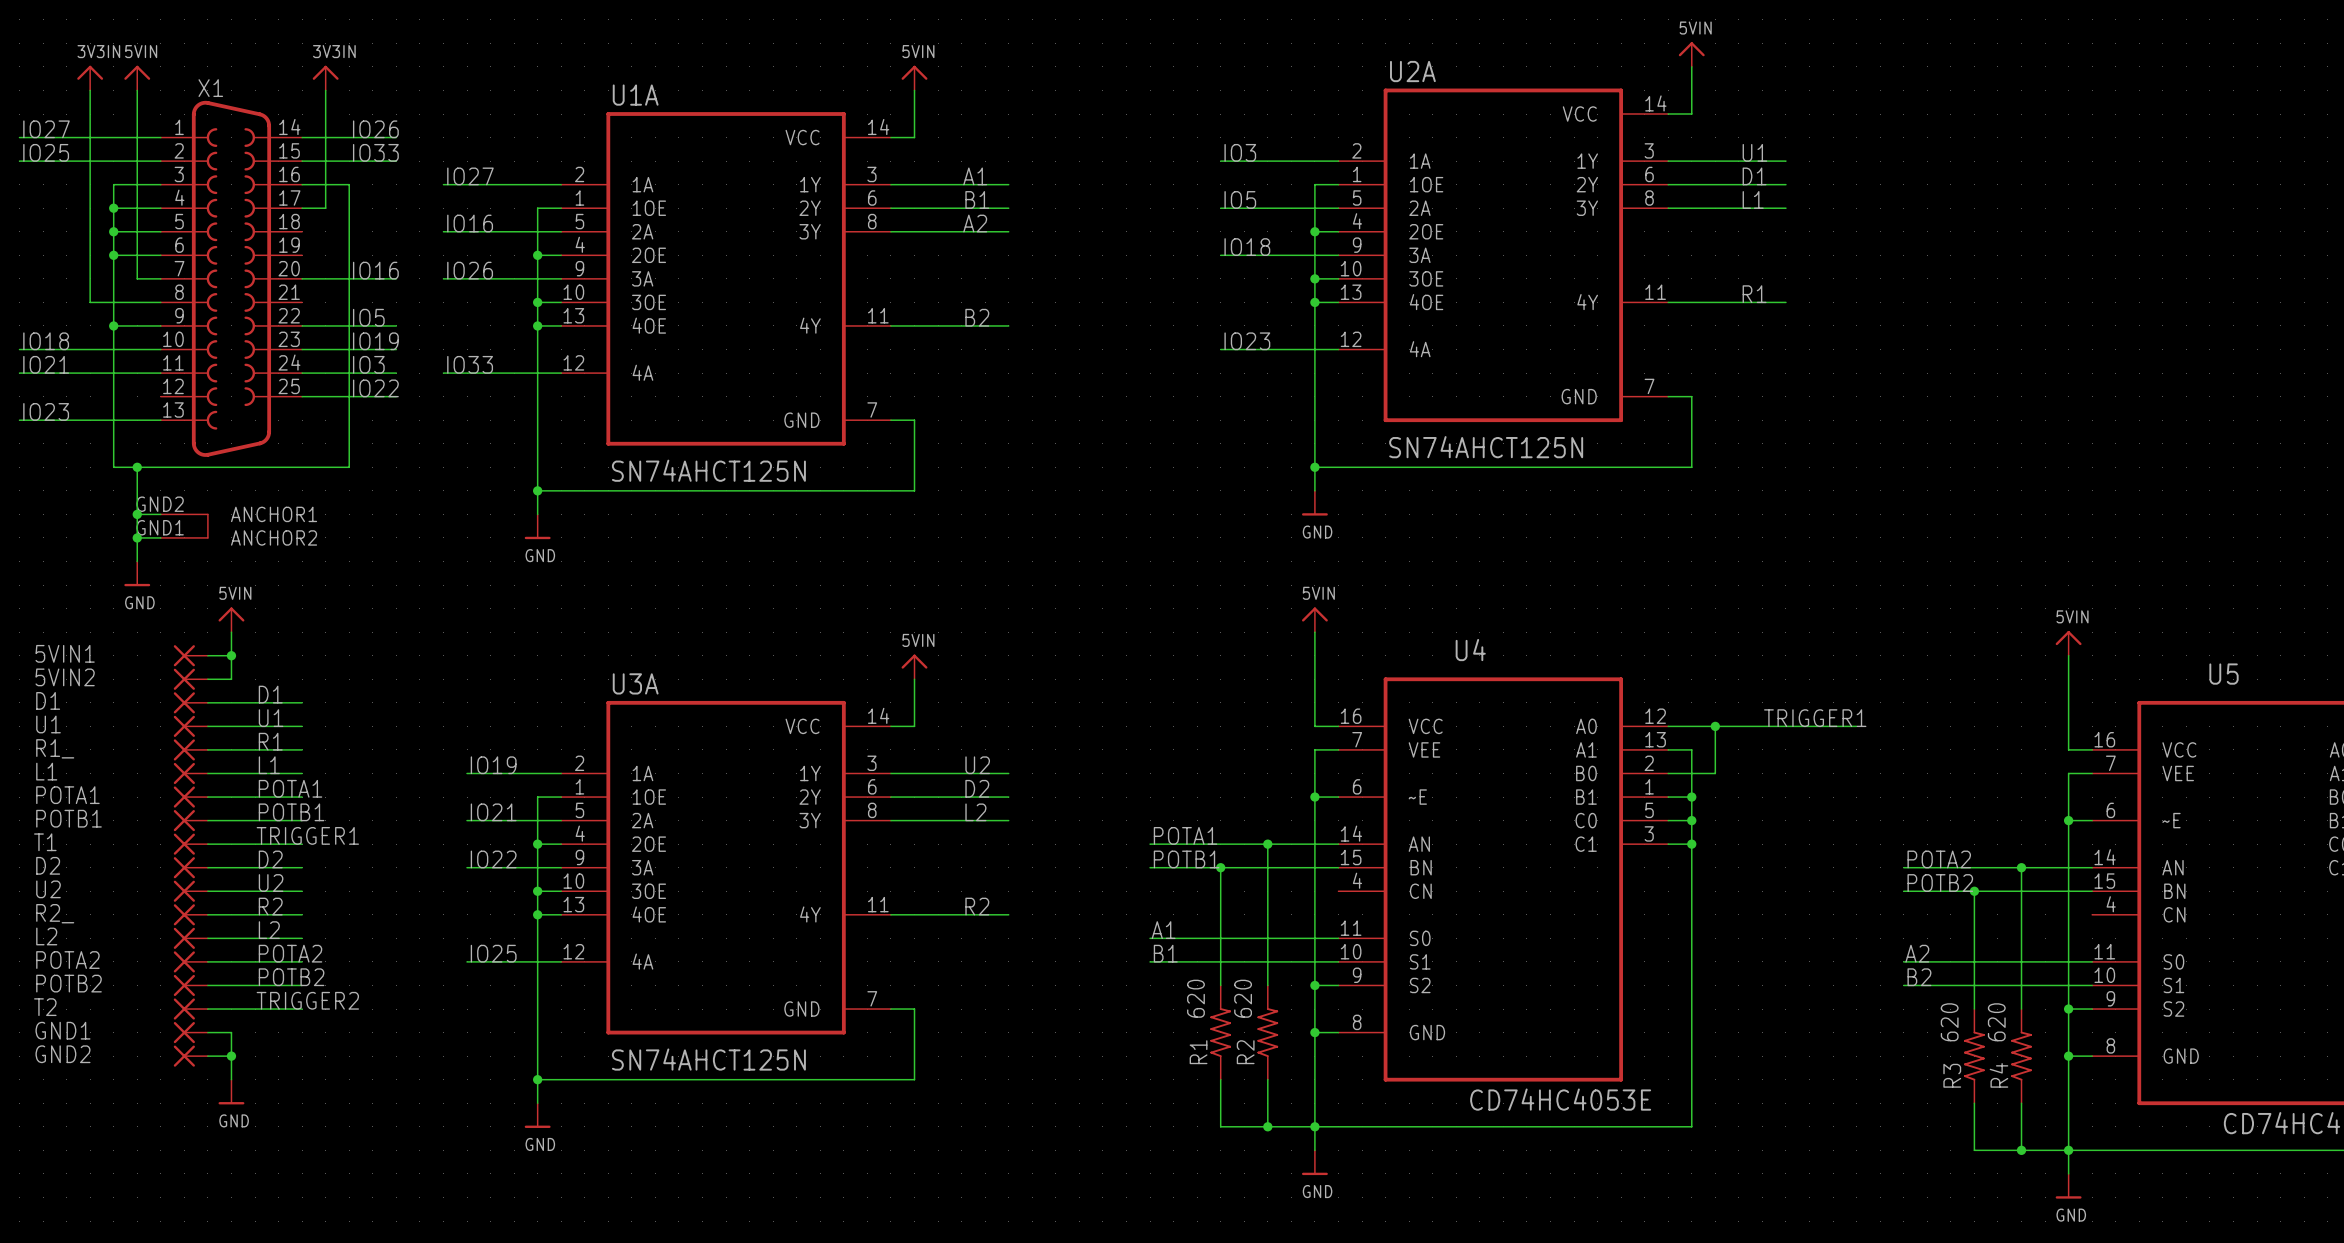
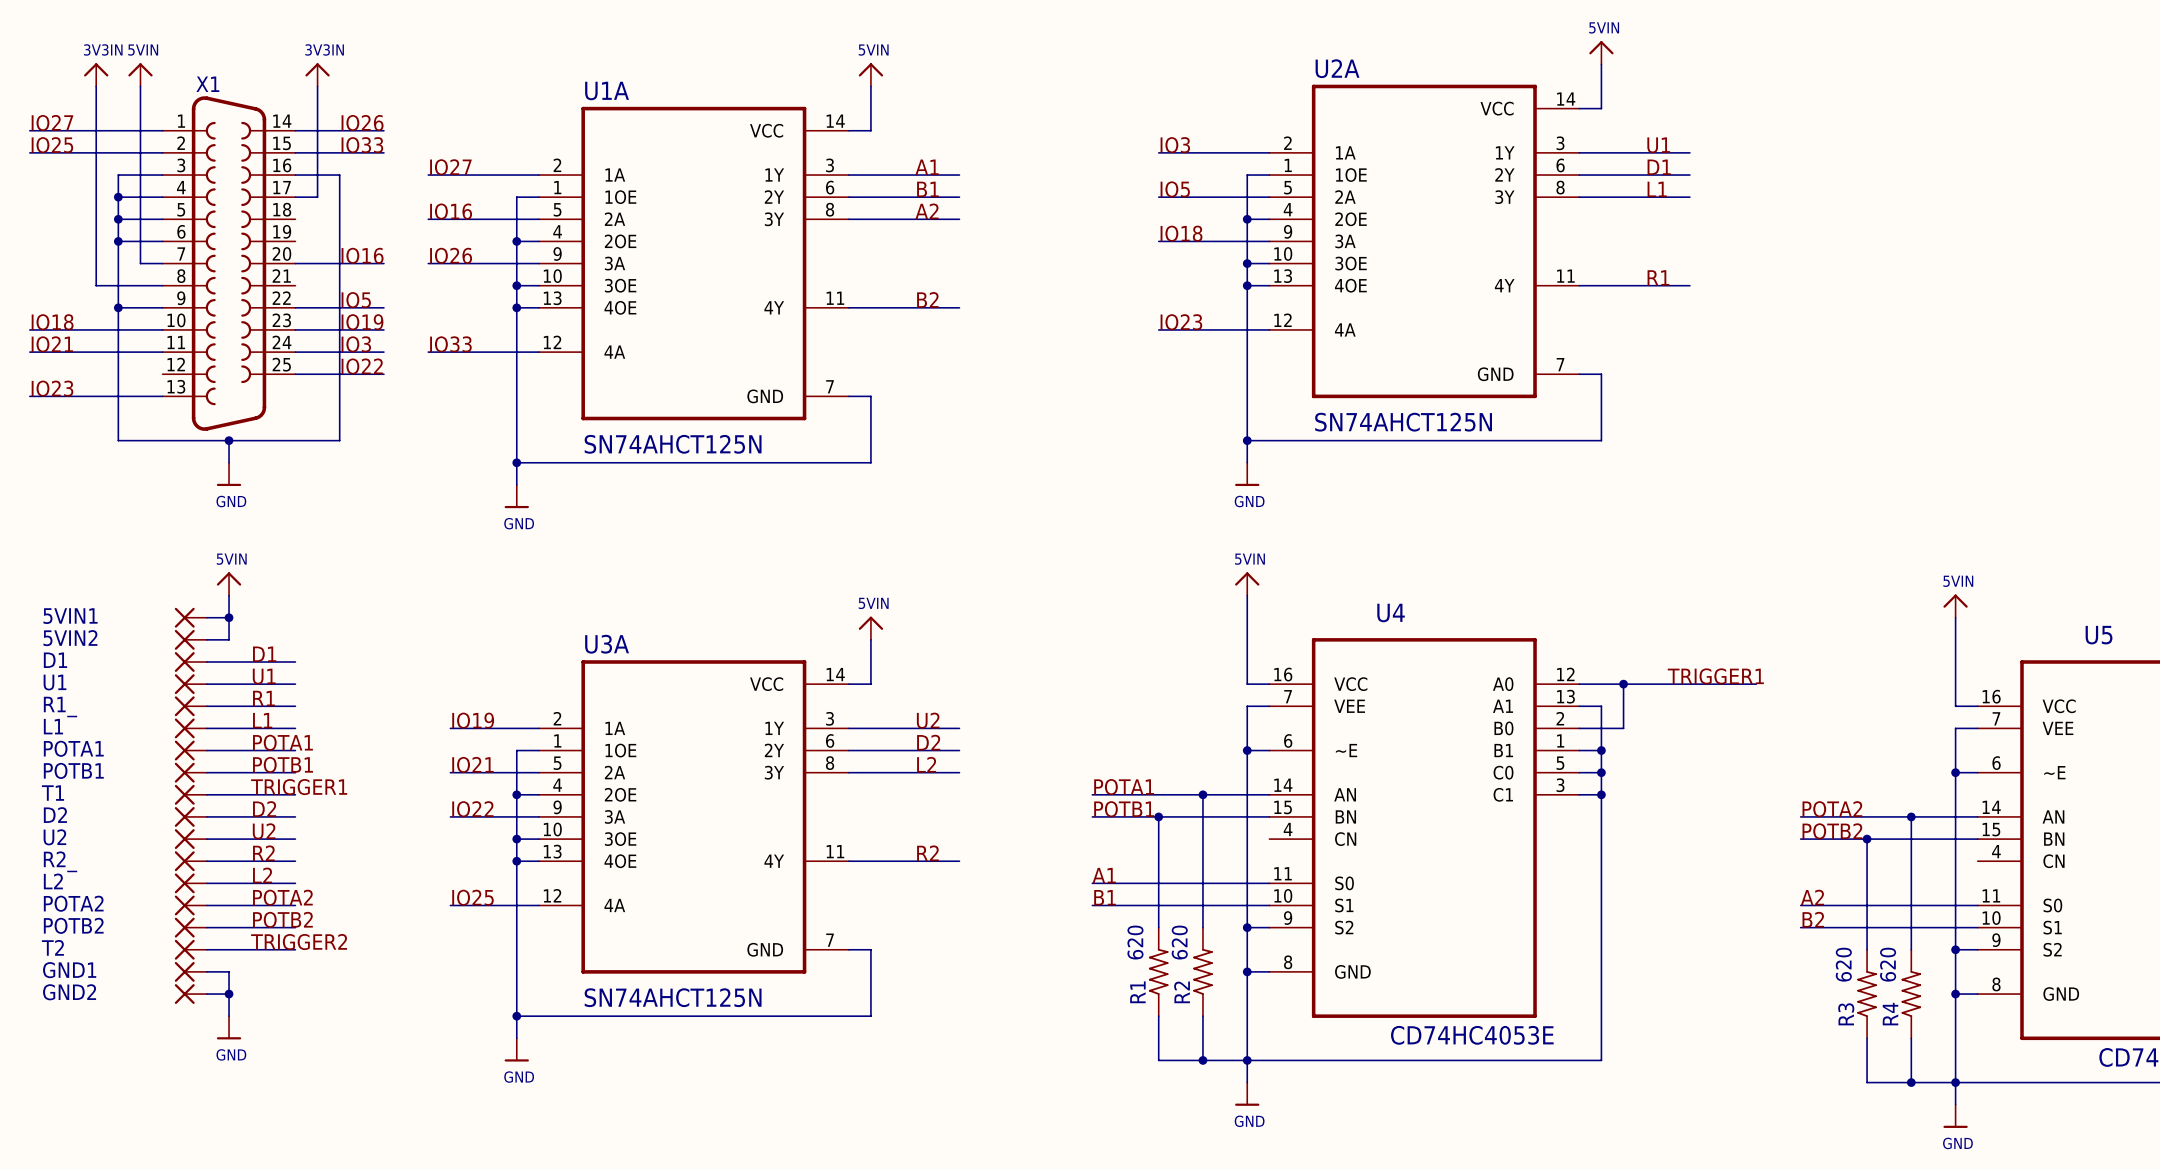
X1 symbol: [160, 100, 303, 539] -> [162, 96, 296, 431]
wire: (137, 467) (137, 561) -> none
junction: (137, 467) -> none
wire: none -> (229, 440) (229, 462)
junction: none -> (229, 440)
wire: (137, 514) (160, 514) -> none
junction: (137, 514) -> none
wire: (137, 537) (160, 537) -> none
junction: (137, 537) -> none
power symbol position: GND (137, 573) -> GND (229, 474)

